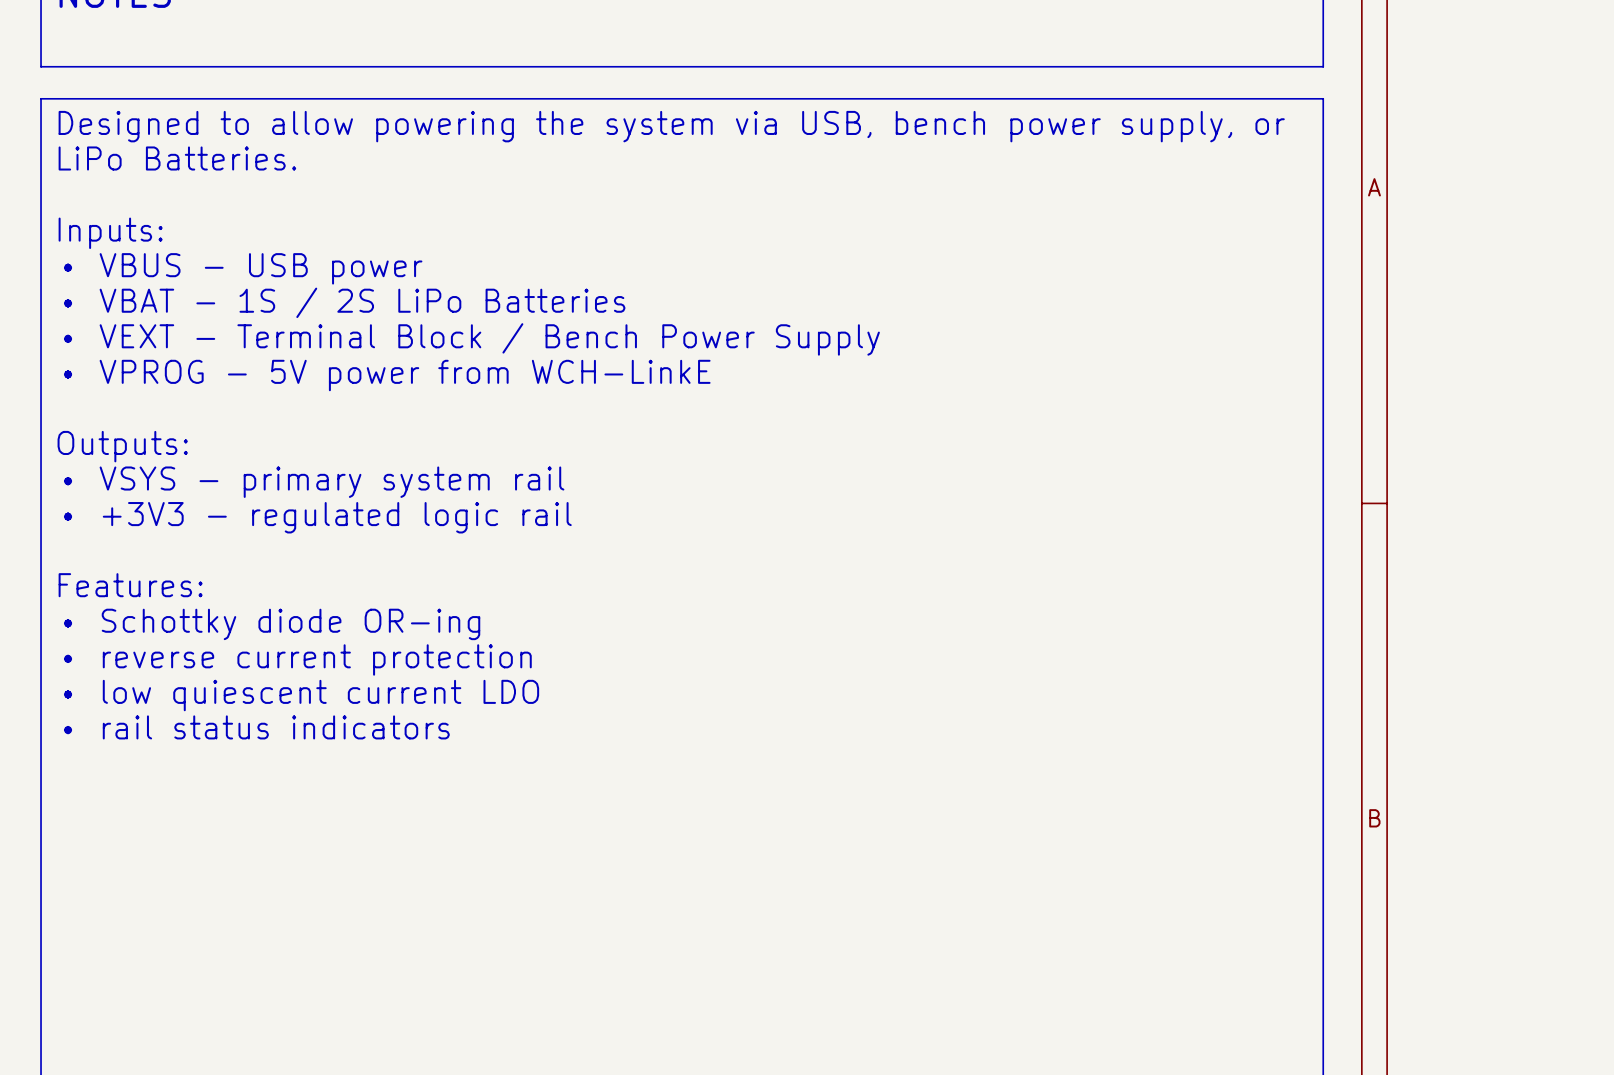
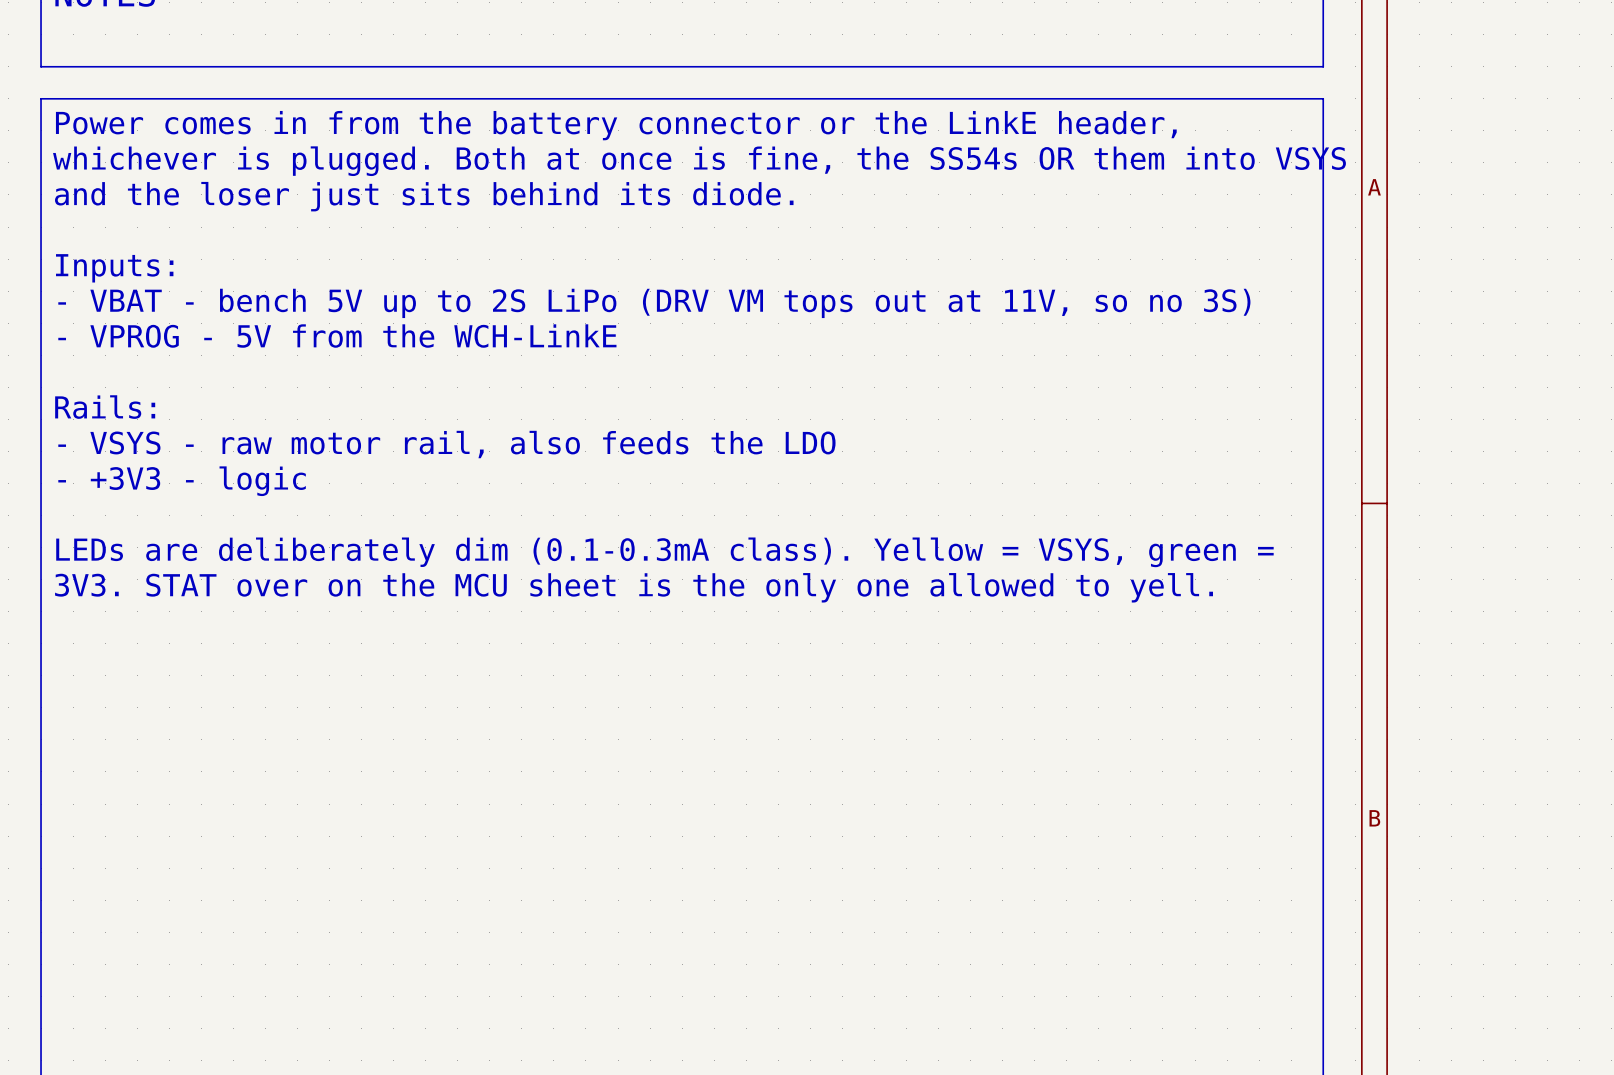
text: Designed to allow powering the system via USB, bench power supply, or (671, 126) -> Power comes in from the battery connector or the LinkE header, (616, 125)
text: LiPo Batteries. (177, 158) -> whichever is plugged. Both at once is fine, the SS54s OR them into VSYS (699, 161)
text: none -> and the loser just sits behind its diode. (424, 196)
text: Inputs: (110, 233) -> none
text: • VBUS - USB power (243, 268) -> Inputs: (114, 268)
text: • VBAT - 1S / 2S LiPo Batteries (344, 302) -> - VBAT - bench 5V up to 2S LiPo (DRV VM tops out at 11V, so no 3S) (654, 303)
text: • VEXT - Terminal Block / Bench Power Supply (471, 339) -> - VPROG - 5V from the WCH-LinkE (337, 336)
text: • VPROG - 5V power from WCH-LinkE (387, 375) -> none
text: none -> Rails: (105, 407)
text: Outputs: (122, 446) -> - VSYS - raw motor rail, also feeds the LDO (446, 444)
text: • VSYS - primary system rail (314, 482) -> - +3V3 - logic (182, 481)
text: • +3V3 - regulated logic rail (317, 517) -> none
text: none -> LEDs are deliberately dim (0.1-0.3mA class). Yellow = VSYS, green = (664, 552)
text: Features: (130, 585) -> 3V3. STAT over on the MCU sheet is the only one allowed to yell. (634, 587)
text: • Schottky diode OR-ing (272, 624) -> none
text: • reverse current protection (297, 659) -> none
text: • low quiescent current LDO (301, 695) -> none
text: • rail status indicators (256, 727) -> none

